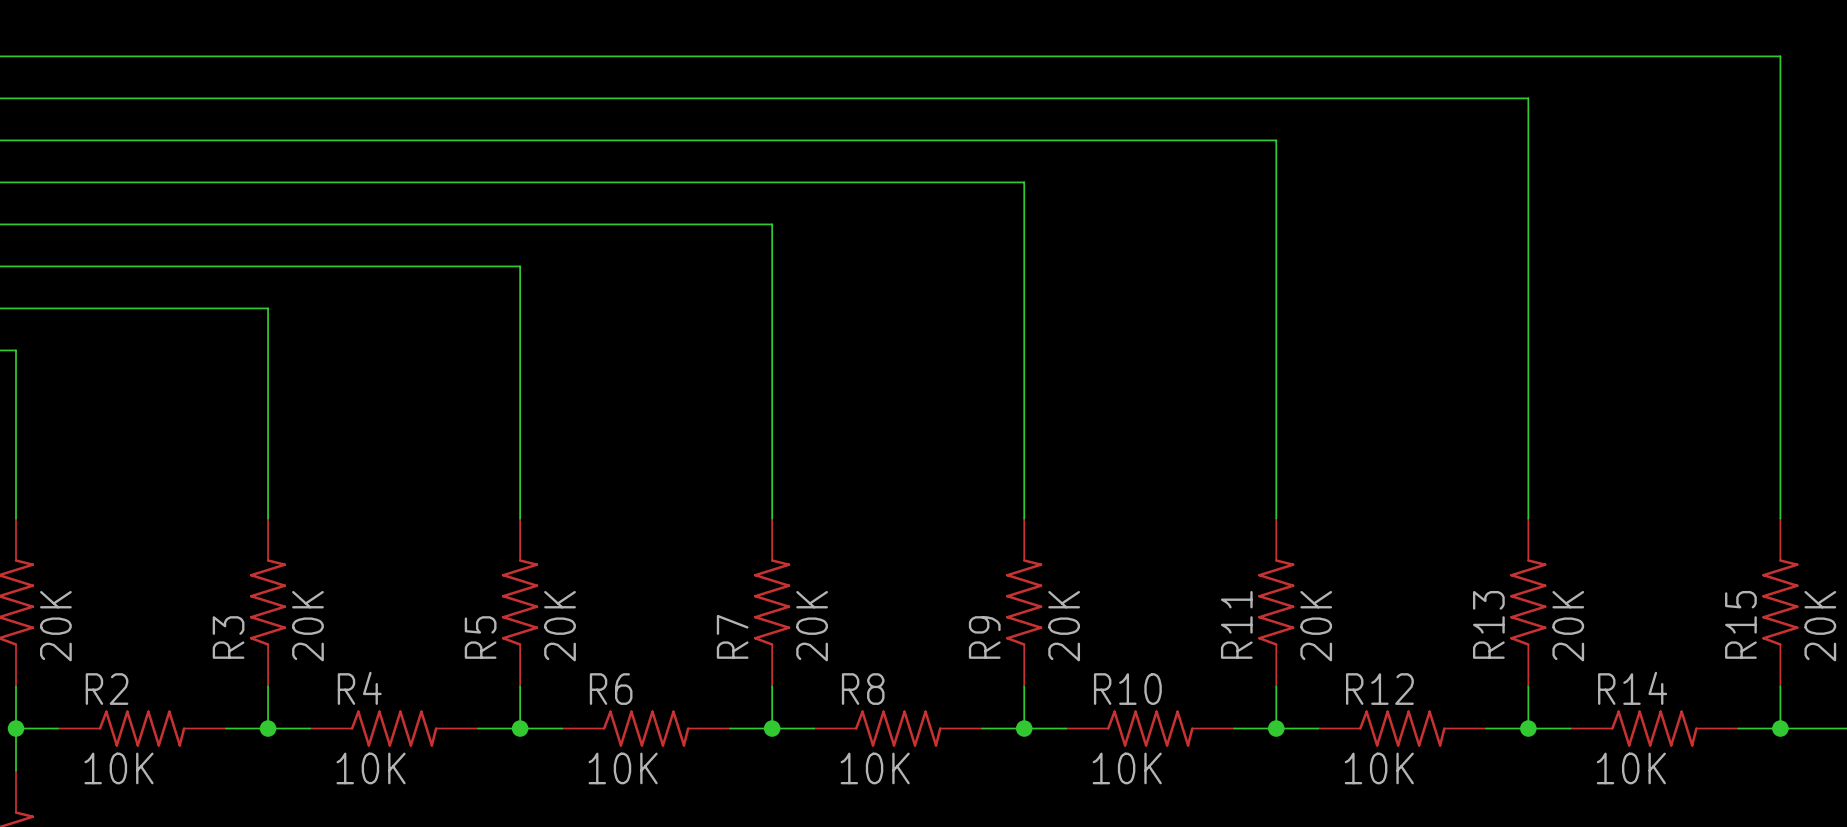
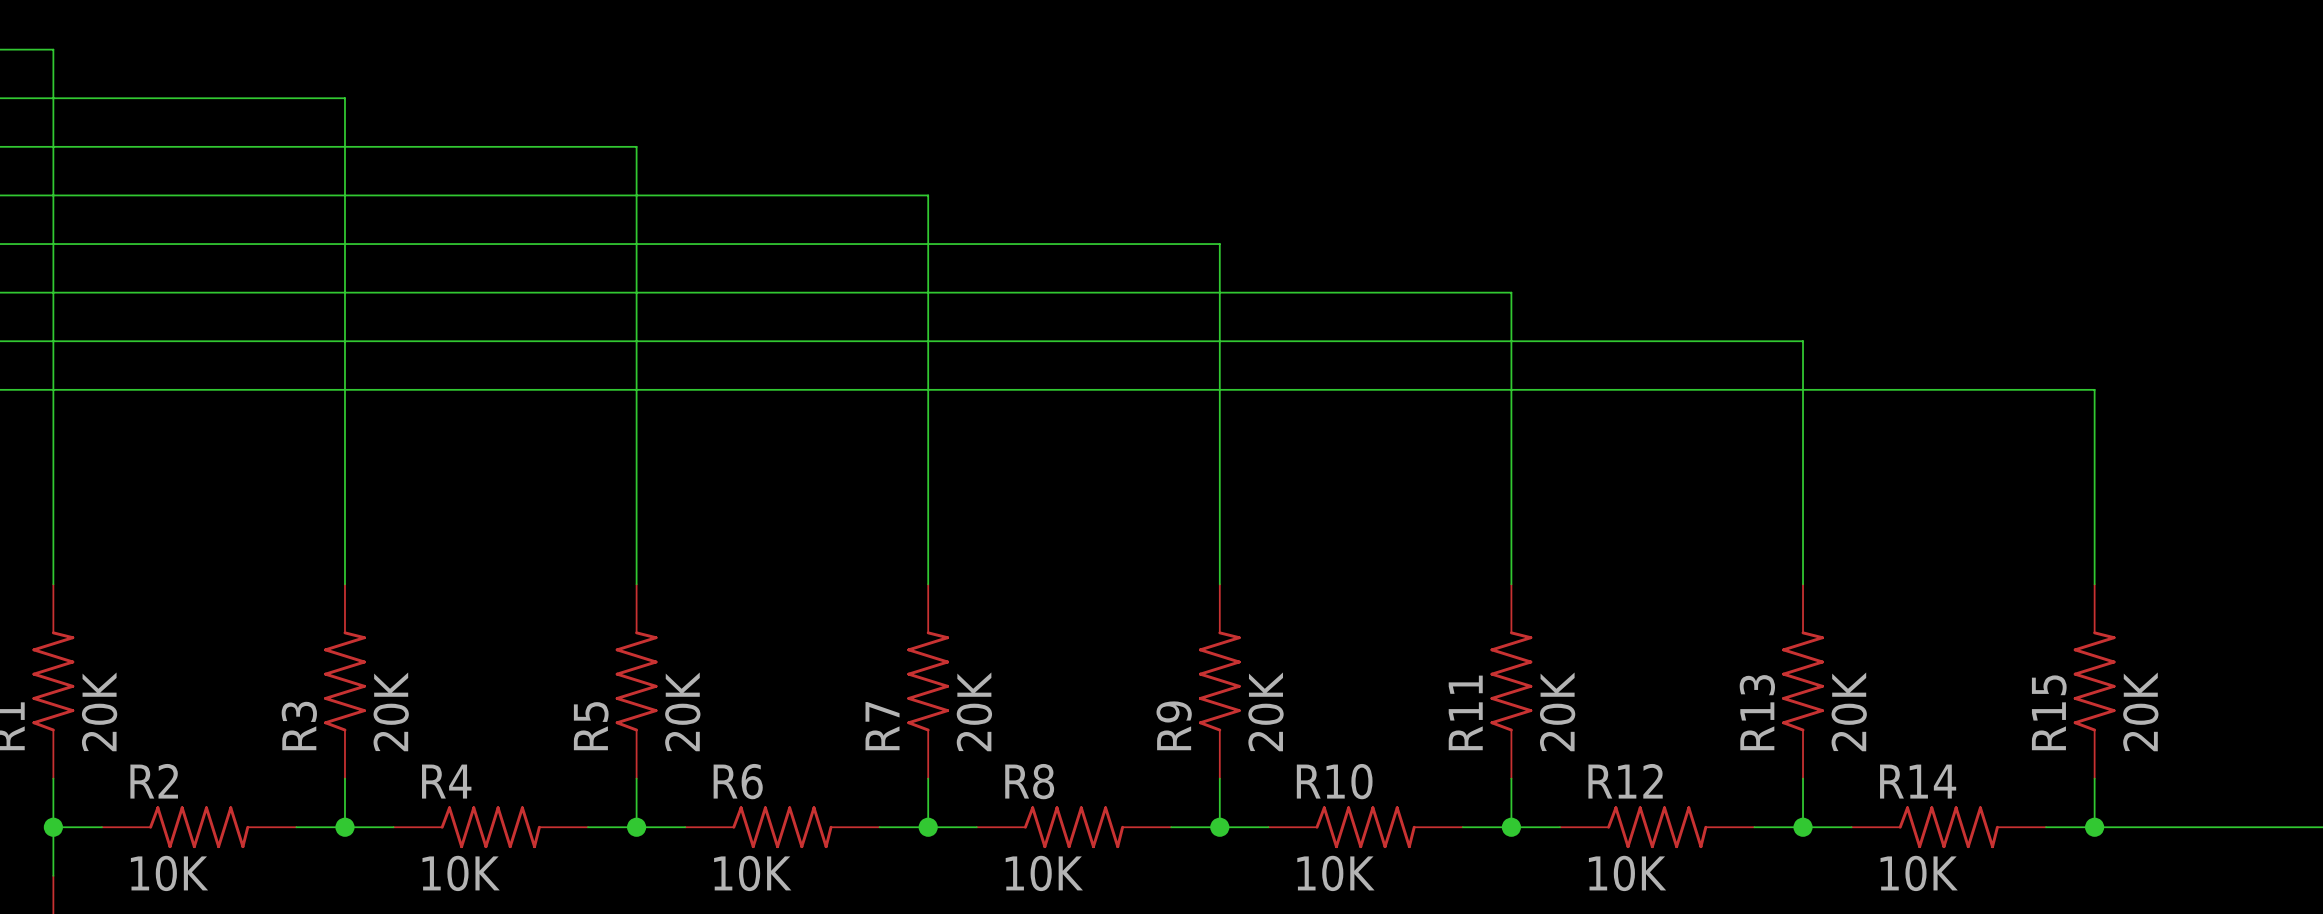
wire: (16, 56) (1780, 56) (1780, 350) -> (53, 49) (53, 389) (2094, 389)
wire: (268, 98) (1528, 98) (1528, 308) -> (344, 98) (344, 341) (1803, 341)
wire: (520, 140) (1276, 140) (1276, 266) -> (636, 146) (636, 292) (1511, 292)
wire: (772, 182) (1024, 182) (1024, 224) -> (928, 195) (928, 244) (1219, 244)

